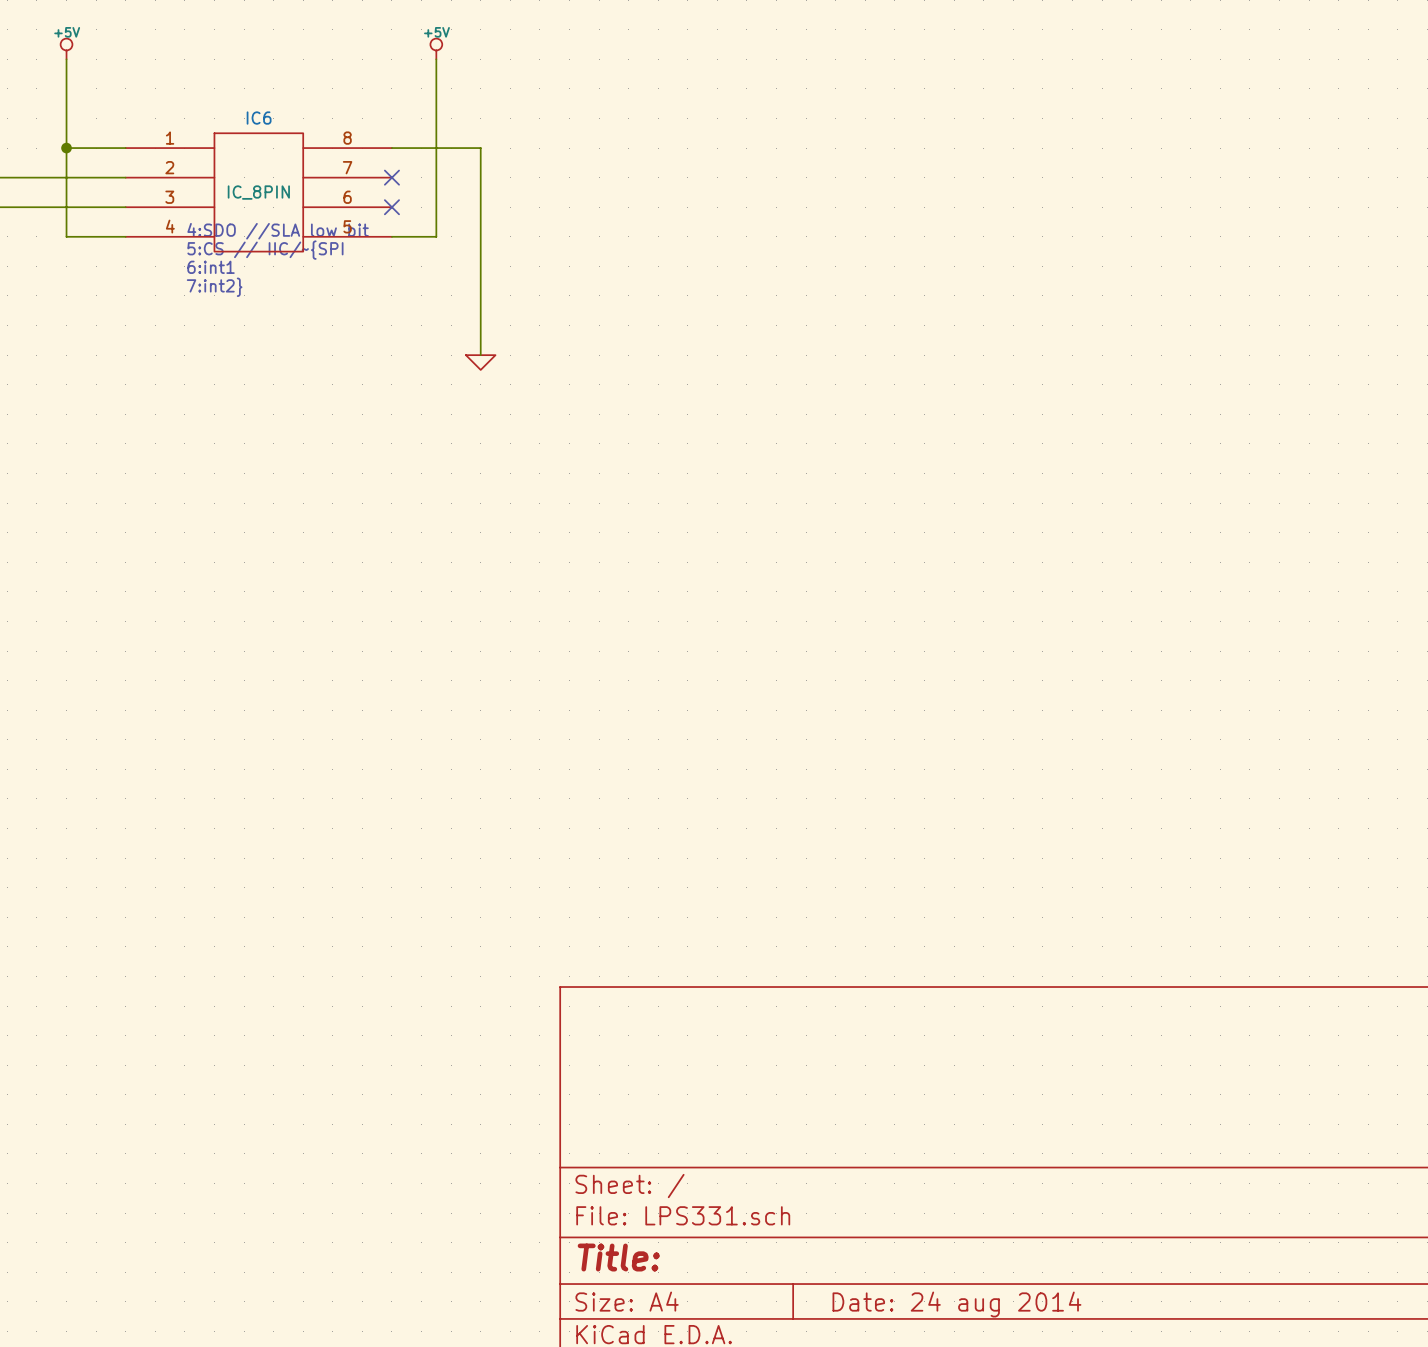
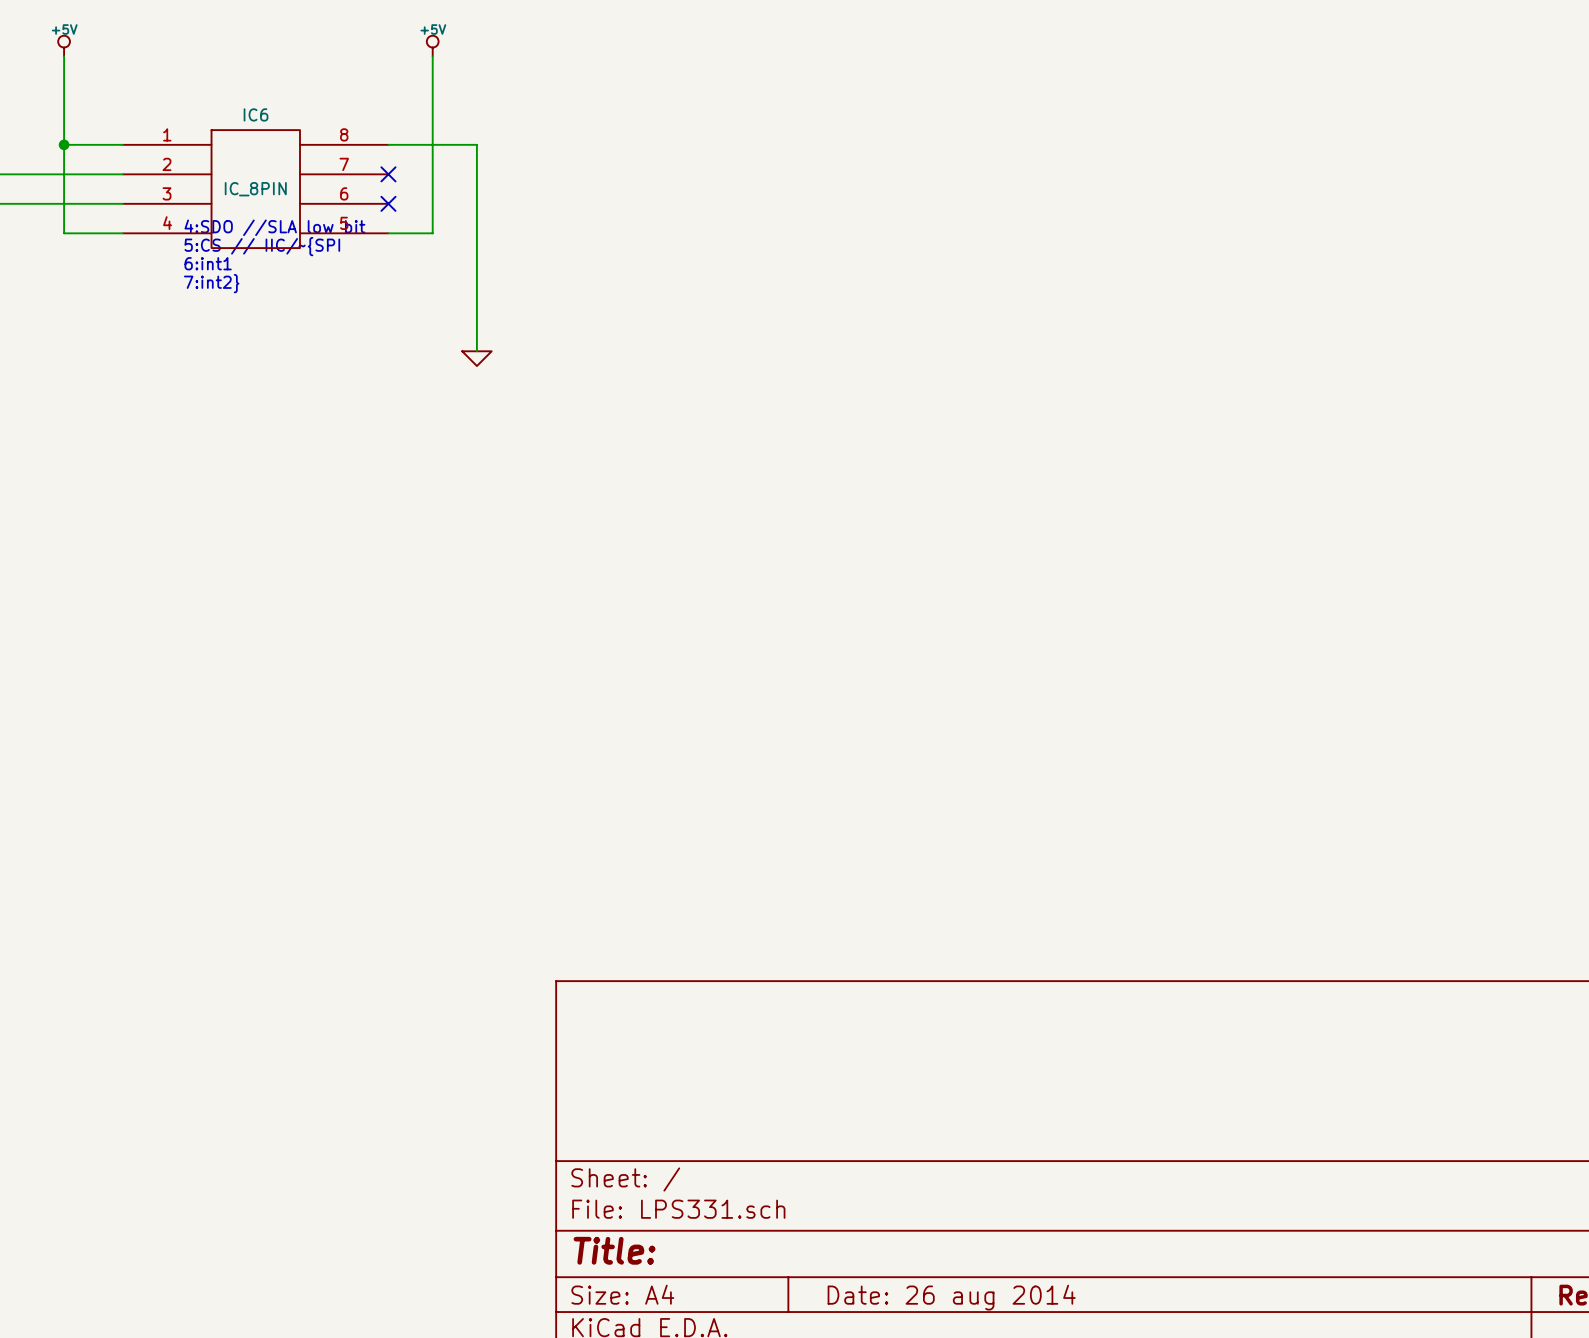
title block: Date: 24 aug 2014 (956, 1304) -> Date: 26 aug 2014 (951, 1297)

